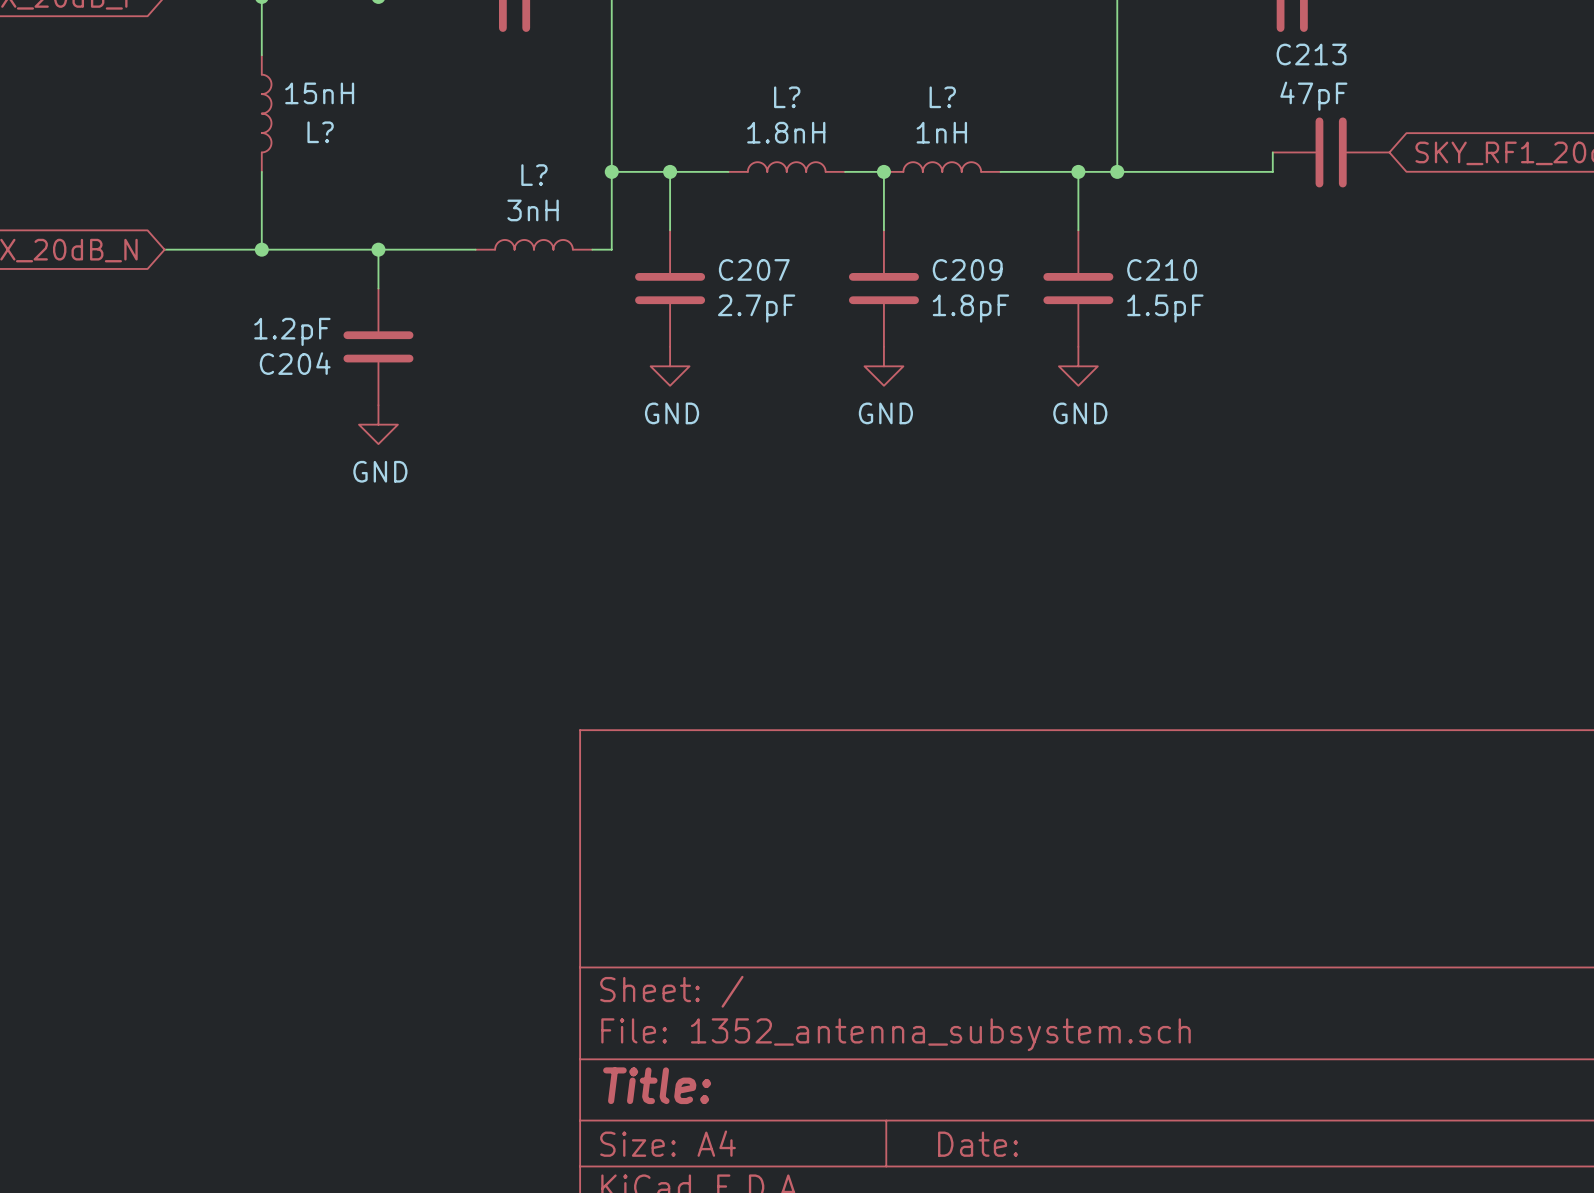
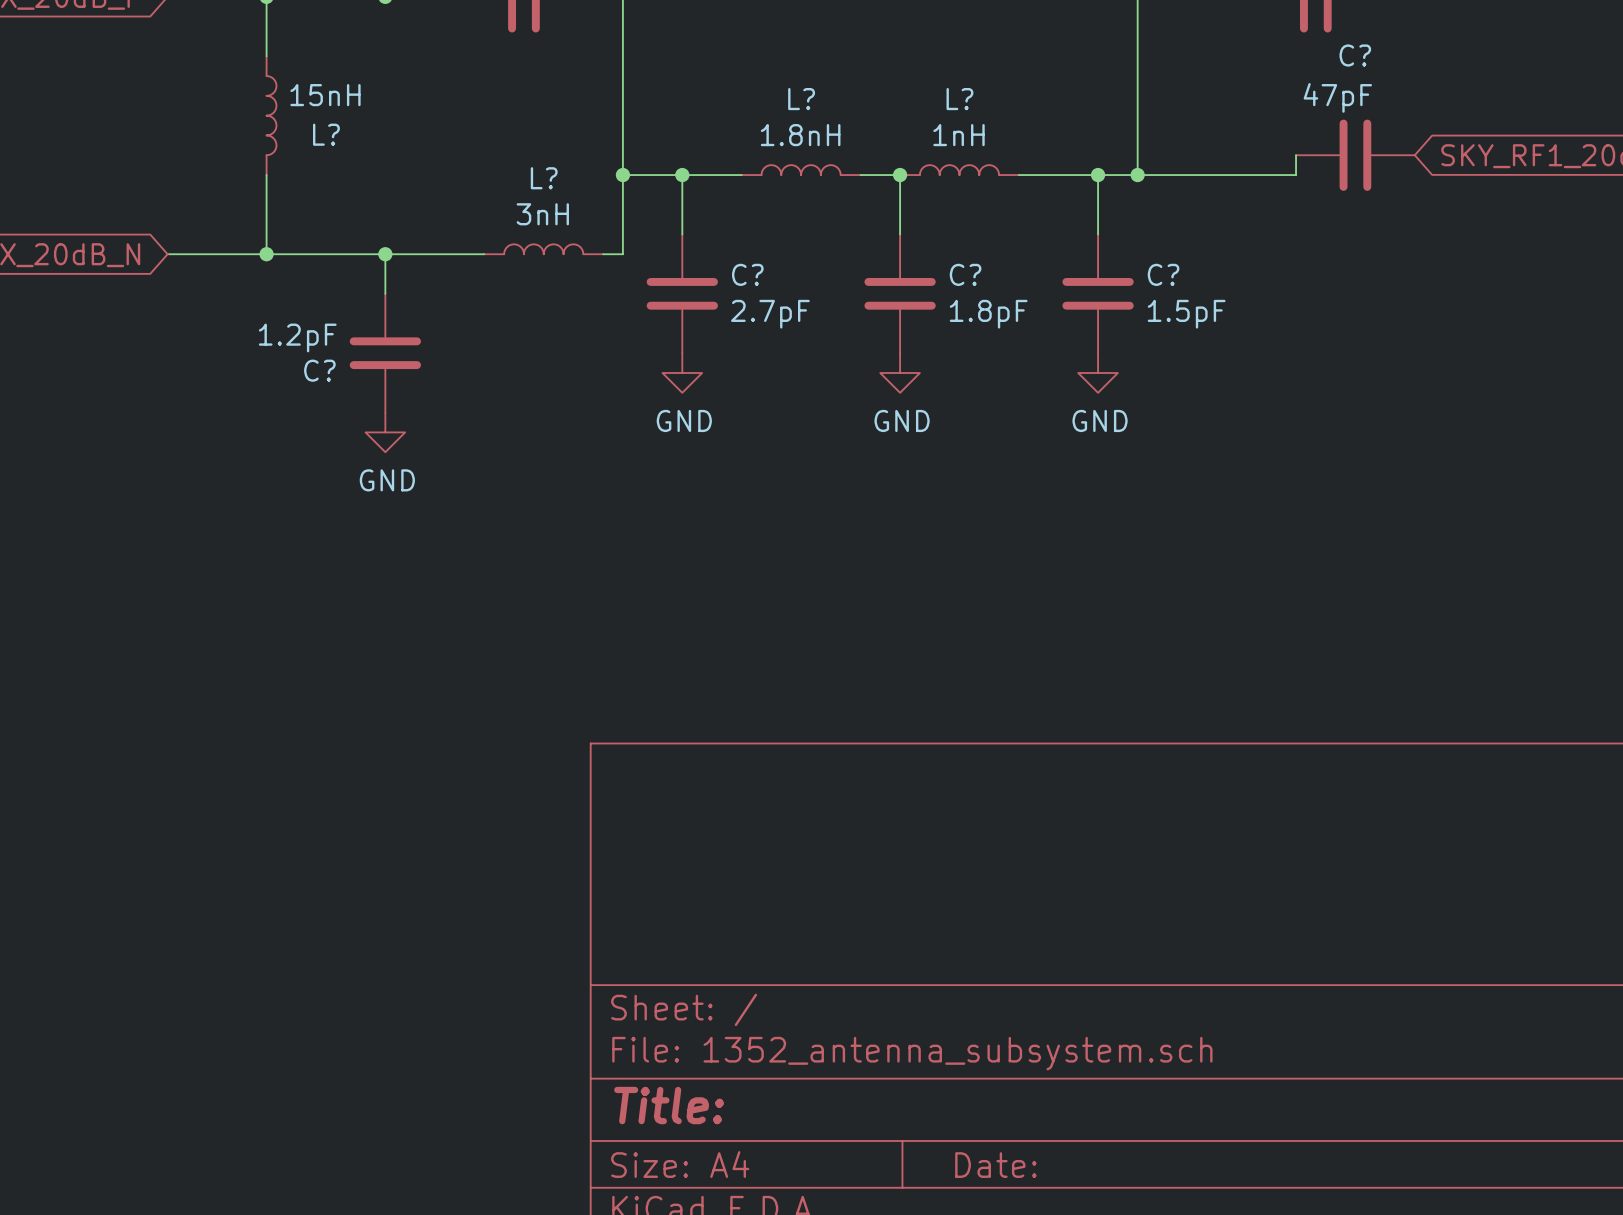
C213 name: C213 (1311, 54) -> C? (1355, 55)
C207 name: C207 (754, 269) -> C? (747, 274)
C209 name: C209 (967, 269) -> C? (965, 274)
C210 name: C210 (1162, 269) -> C? (1163, 274)
C204 name: C204 (295, 363) -> C? (319, 370)

